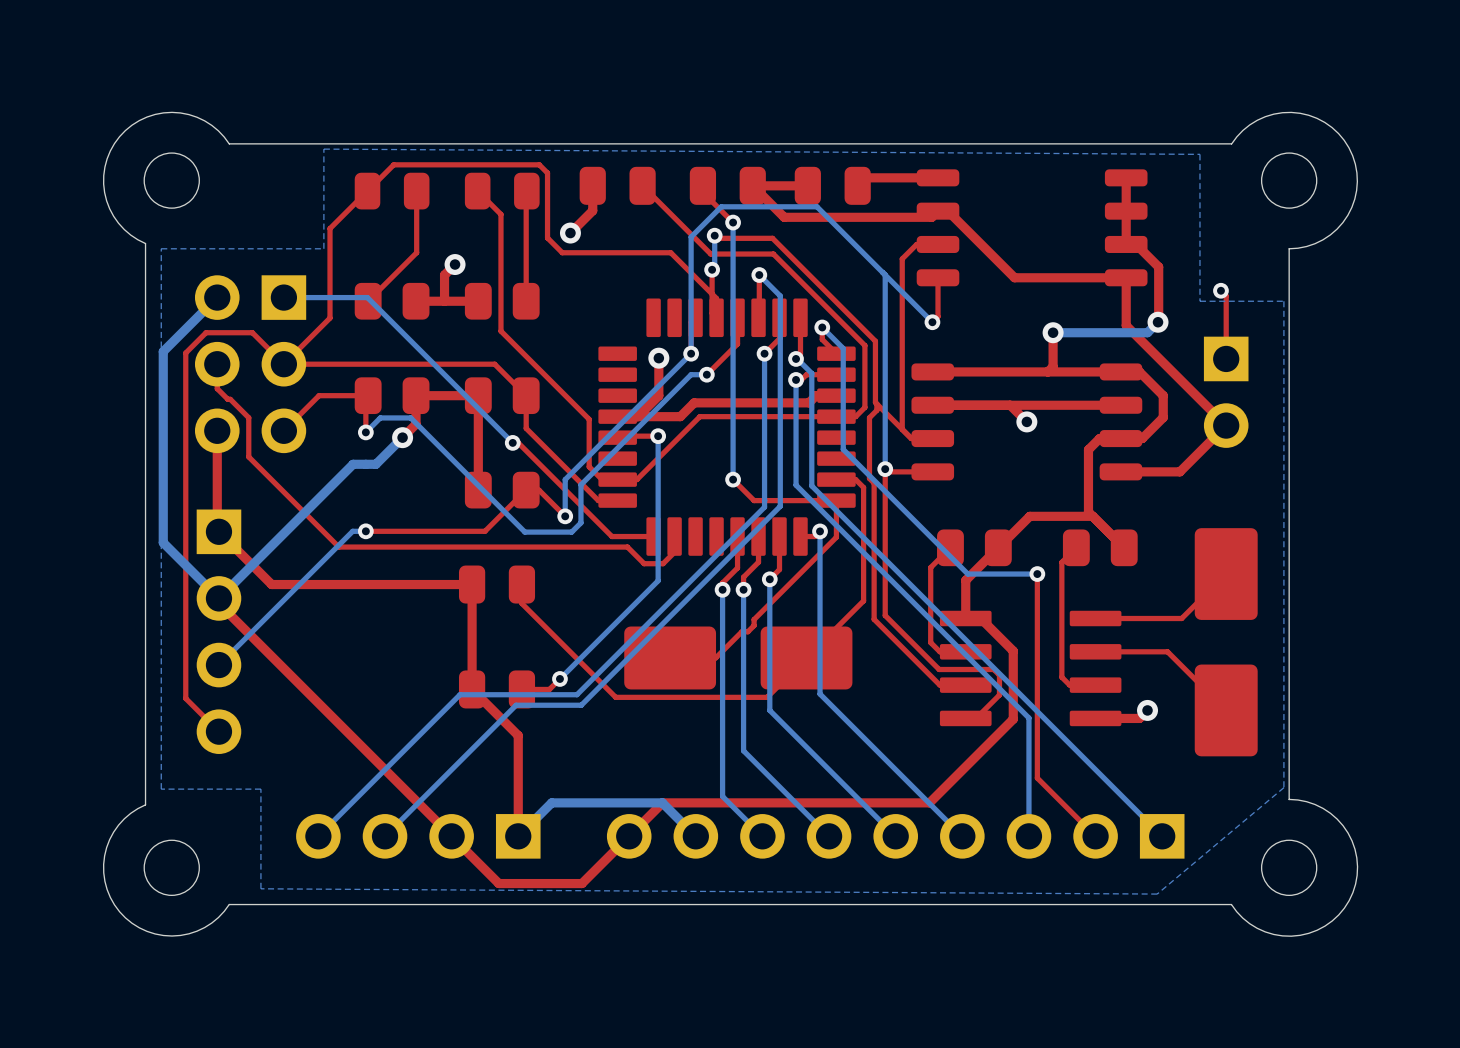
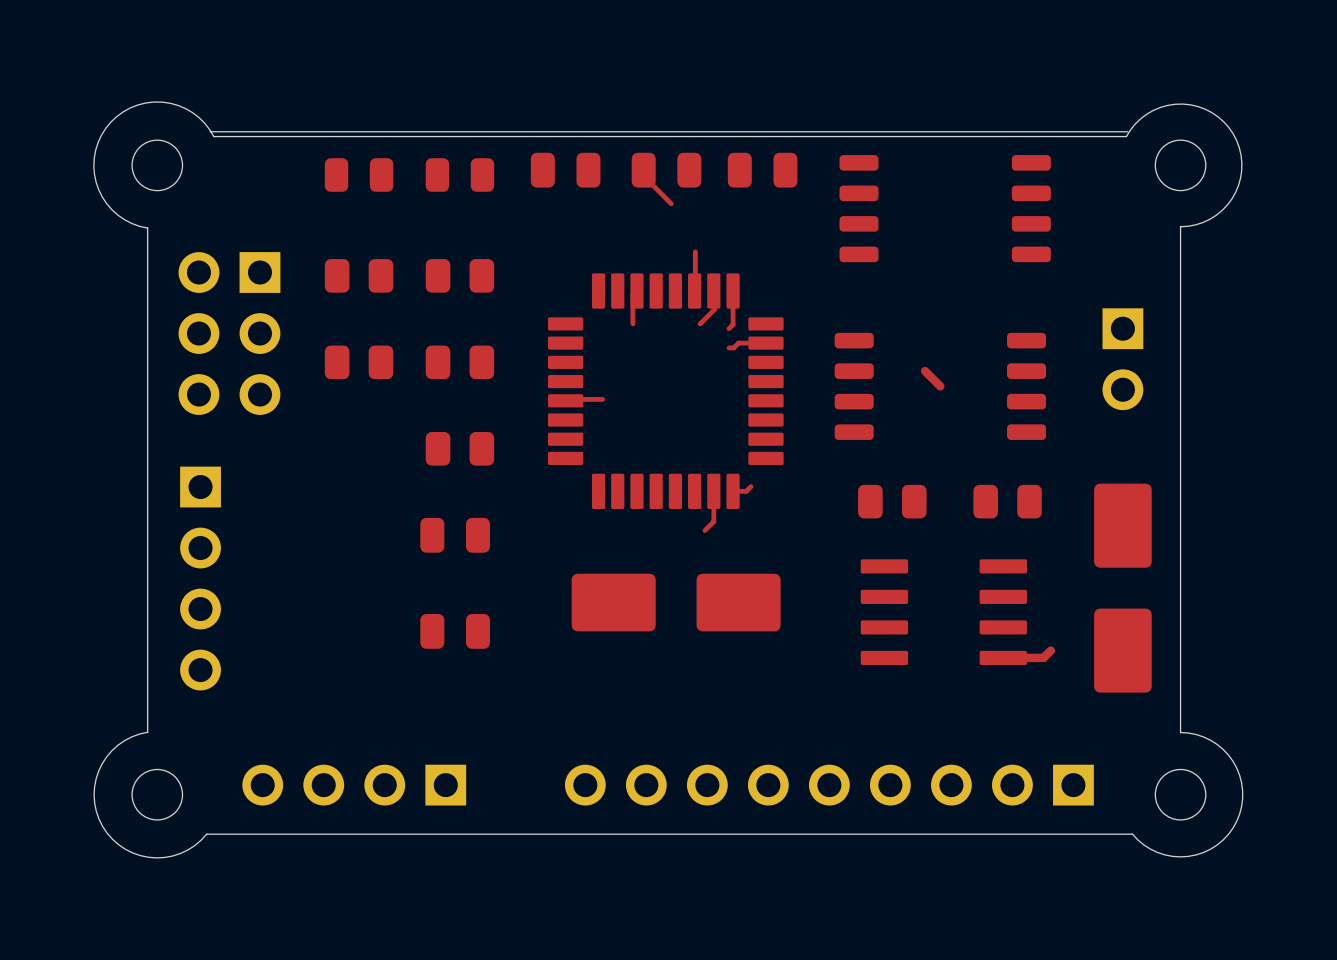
board edge: (229, 143) (218, 130) (196, 117) (172, 112) (147, 117) (125, 130) (114, 143) (107, 158) (103, 184) (106, 200) (113, 216) (130, 235) (145, 243) (145, 804) (130, 813) (113, 832) (104, 855) (104, 881) (110, 897) (125, 917) (139, 927) (155, 933) (172, 936) (196, 931) (218, 917) (229, 904) -> none
board edge: (1231, 143) (1242, 130) (1257, 120) (1273, 114) (1291, 112) (1308, 115) (1324, 122) (1338, 133) (1348, 147) (1355, 164) (1357, 181) (1354, 199) (1347, 215) (1336, 229) (1322, 239) (1306, 246) (1289, 248) -> (147, 732) (147, 228) (124, 219) (106, 203) (96, 182) (93, 166) (95, 150) (101, 135) (116, 116) (130, 107) (154, 102) (178, 105) (198, 117) (213, 136) (1126, 136) (1140, 118) (1153, 110) (1167, 105) (1190, 104) (1211, 112) (1228, 127) (1239, 147) (1241, 170) (1235, 192) (1222, 210) (1202, 222) (1180, 227)
bottom zone outline: (323, 149) (323, 248) (161, 248) (161, 789) (260, 789) (260, 888) (1157, 894) (1283, 787) (1283, 301) (1199, 301) (1199, 154) (323, 149) -> none
top track: (938, 177) (865, 177) (857, 185) -> none
top track: (1126, 177) (1126, 244) (1136, 244) (1158, 267) (1158, 322) -> none
top track: (592, 185) (592, 210) (570, 233) -> none
top track: (642, 185) (710, 254) (773, 254) (864, 345) (864, 407) (855, 416) (699, 416) (636, 479) (602, 479) (589, 466) (589, 419) (500, 331) (500, 214) (477, 191) -> none
top track: (807, 185) (752, 185) (784, 217) (931, 217) (938, 211) (947, 211) (1014, 277) (1126, 277) (1126, 325) (1226, 425) (1179, 471) (1120, 471) -> none
top track: (416, 191) (416, 252) (368, 301) -> none
top track: (526, 191) (526, 301) -> none
bottom track: (733, 222) (733, 479) -> none
via: (733, 222) -> none
via: (570, 233) -> none
top track: (714, 235) (717, 238) (772, 238) (875, 341) (875, 402) (911, 438) (932, 438) -> none
bottom track: (714, 235) (714, 267) (712, 269) -> none
via: (714, 235) -> none
top track: (938, 244) (916, 244) (902, 258) (902, 429) -> none
top track: (455, 264) (444, 275) (444, 301) -> none
via: (455, 264) -> none
top track: (712, 269) (712, 313) (716, 317) (716, 298) (670, 252) (562, 252) (547, 237) (547, 173) (539, 164) (393, 164) (330, 228) (330, 318) (283, 364) -> none
via: (712, 269) -> none
bottom track: (759, 275) (780, 296) (780, 506) (581, 705) (516, 705) (385, 836) -> none
via: (759, 275) -> none
bottom track: (885, 275) (885, 469) -> none
top track: (938, 277) (938, 316) (932, 322) -> none
top track: (1220, 290) (1226, 296) (1226, 358) -> none
via: (1220, 290) -> none
bottom track: (217, 297) (163, 351) (163, 542) (218, 598) (353, 464) (375, 464) (402, 437) -> none
bottom track: (283, 297) (367, 297) (512, 442) -> none
top track: (478, 301) (416, 301) -> none
top track: (737, 317) (737, 344) (706, 374) -> none
bottom track: (932, 322) (816, 206) (721, 206) (691, 236) (691, 353) (565, 479) (565, 516) -> none
via: (932, 322) -> none
bottom track: (1158, 322) (1147, 332) (1053, 332) -> none
via: (1158, 322) -> none
top track: (822, 327) (822, 339) (836, 353) -> none
bottom track: (822, 327) (843, 348) (843, 449) (967, 574) (1037, 574) -> none
via: (822, 327) -> none
top track: (1053, 332) (1053, 366) (1047, 371) -> none
via: (1053, 332) -> none
via: (691, 353) -> none
bottom track: (764, 353) (764, 507) (576, 694) (460, 694) (318, 836) -> none
via: (764, 353) -> none
top track: (658, 358) (658, 395) (637, 416) -> none
via: (658, 358) -> none
bottom track: (796, 358) (811, 373) (811, 485) (1162, 836) -> none
via: (796, 358) -> none
top track: (217, 364) (217, 388) (248, 417) (248, 456) (338, 547) (627, 547) (644, 563) (663, 563) (674, 552) (674, 536) -> none
top track: (283, 364) (494, 364) (526, 395) (526, 428) (598, 500) (617, 500) -> none
top track: (283, 364) (252, 332) (206, 332) (185, 353) (185, 698) (218, 731) -> none
top track: (932, 371) (1139, 371) (1163, 395) (1163, 417) (1142, 438) (1099, 438) (1088, 449) (1088, 512) (1124, 547) -> none
bottom track: (706, 374) (691, 374) (580, 484) (580, 522) (571, 532) (524, 532) (410, 417) (380, 417) (365, 432) -> none
via: (706, 374) -> none
bottom track: (796, 379) (796, 485) (1028, 718) (1028, 836) -> none
via: (796, 379) -> none
top track: (836, 395) (816, 395) (808, 402) (694, 402) (680, 416) (617, 416) -> none
top track: (876, 404) (876, 410) (869, 417) (869, 478) (874, 483) (874, 619) (939, 685) (965, 685) -> none
top track: (1120, 405) (932, 405) -> none
via: (1026, 421) -> none
top track: (217, 430) (217, 530) (271, 584) (472, 584) (472, 689) (518, 735) (518, 836) -> none
top track: (283, 430) (319, 395) (368, 395) (365, 397) (365, 432) -> none
via: (365, 432) -> none
bottom track: (658, 436) (658, 580) (559, 678) -> none
via: (658, 436) -> none
top track: (402, 437) (416, 424) (416, 395) (478, 395) (478, 490) -> none
via: (402, 437) -> none
top track: (512, 442) (518, 442) (611, 536) (653, 536) -> none
via: (512, 442) -> none
via: (885, 469) -> none
top track: (932, 471) (887, 471) (885, 469) (885, 615) (939, 669) (993, 669) (999, 675) (999, 695) (976, 718) (965, 718) -> none
top track: (733, 479) (754, 500) (836, 500) (836, 537) (754, 619) (754, 625) (747, 631) (741, 631) (715, 657) (670, 657) -> none
via: (733, 479) -> none
top track: (836, 479) (855, 479) (863, 487) (863, 600) (767, 697) (615, 697) (521, 603) (521, 584) -> none
top track: (565, 516) (538, 490) (526, 490) (484, 531) (365, 531) -> none
via: (565, 516) -> none
top track: (1092, 516) (1029, 516) (965, 580) (965, 618) (980, 618) (1013, 651) (1013, 719) (929, 802) (662, 802) (582, 883) (498, 883) (218, 603) (218, 598) -> none
bottom track: (365, 531) (352, 531) (218, 665) -> none
via: (365, 531) -> none
bottom track: (820, 531) (820, 694) (962, 836) -> none
via: (820, 531) -> none
top track: (737, 536) (737, 568) (722, 582) (722, 589) -> none
top track: (758, 536) (758, 562) (743, 577) (743, 589) -> none
top track: (950, 547) (930, 567) (930, 642) (939, 651) (965, 651) -> none
top track: (1076, 547) (1061, 562) (1061, 677) (1069, 685) (1095, 685) -> none
top track: (1037, 574) (1037, 778) (1095, 836) -> none
via: (1037, 574) -> none
top track: (1226, 574) (1181, 618) (1095, 618) -> none
bottom track: (769, 579) (769, 710) (895, 836) -> none
via: (769, 579) -> none
bottom track: (722, 589) (722, 796) (762, 836) -> none
via: (722, 589) -> none
bottom track: (743, 589) (743, 750) (829, 836) -> none
via: (743, 589) -> none
top track: (1095, 651) (1167, 651) (1226, 710) -> none
top track: (559, 678) (549, 689) (521, 689) -> none
via: (559, 678) -> none
via: (1147, 710) -> none
board edge: (1289, 799) (1315, 804) (1337, 819) (1352, 840) (1357, 866) (1352, 892) (1338, 915) (1324, 926) (1300, 935) (1282, 935) (1265, 931) (1249, 923) (1231, 904) (229, 904) -> (1180, 732) (1203, 736) (1223, 749) (1236, 768) (1242, 790) (1239, 814) (1228, 834) (1210, 849) (1188, 856) (1172, 856) (1157, 852) (1143, 844) (1132, 834) (206, 834) (194, 845) (180, 853) (156, 857) (132, 852) (118, 844) (102, 826) (94, 803) (96, 778) (106, 756) (124, 740) (147, 732)
part position: (418, 836) -> (354, 785)
bottom track: (695, 836) (662, 802) (551, 802) (518, 836) -> none
part position: (895, 836) -> (829, 785)

